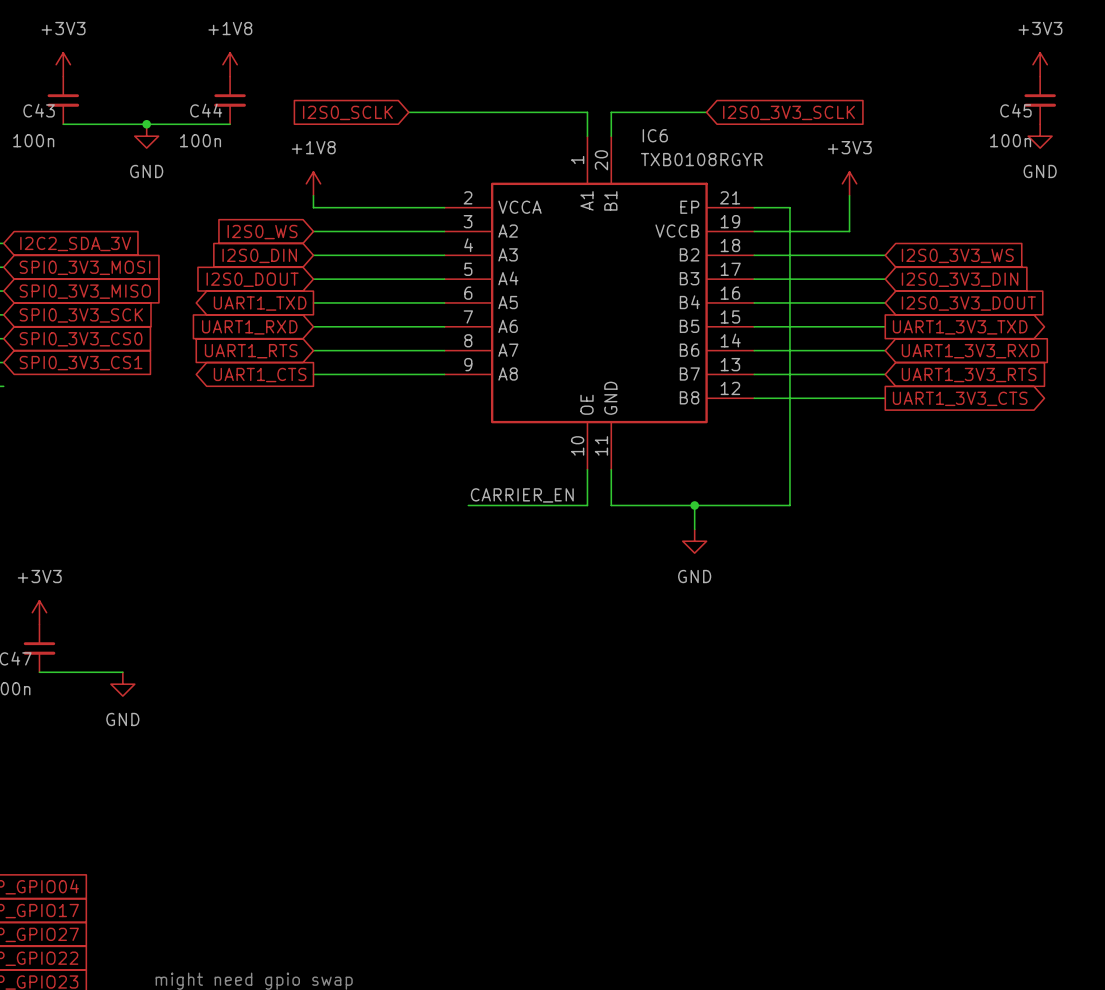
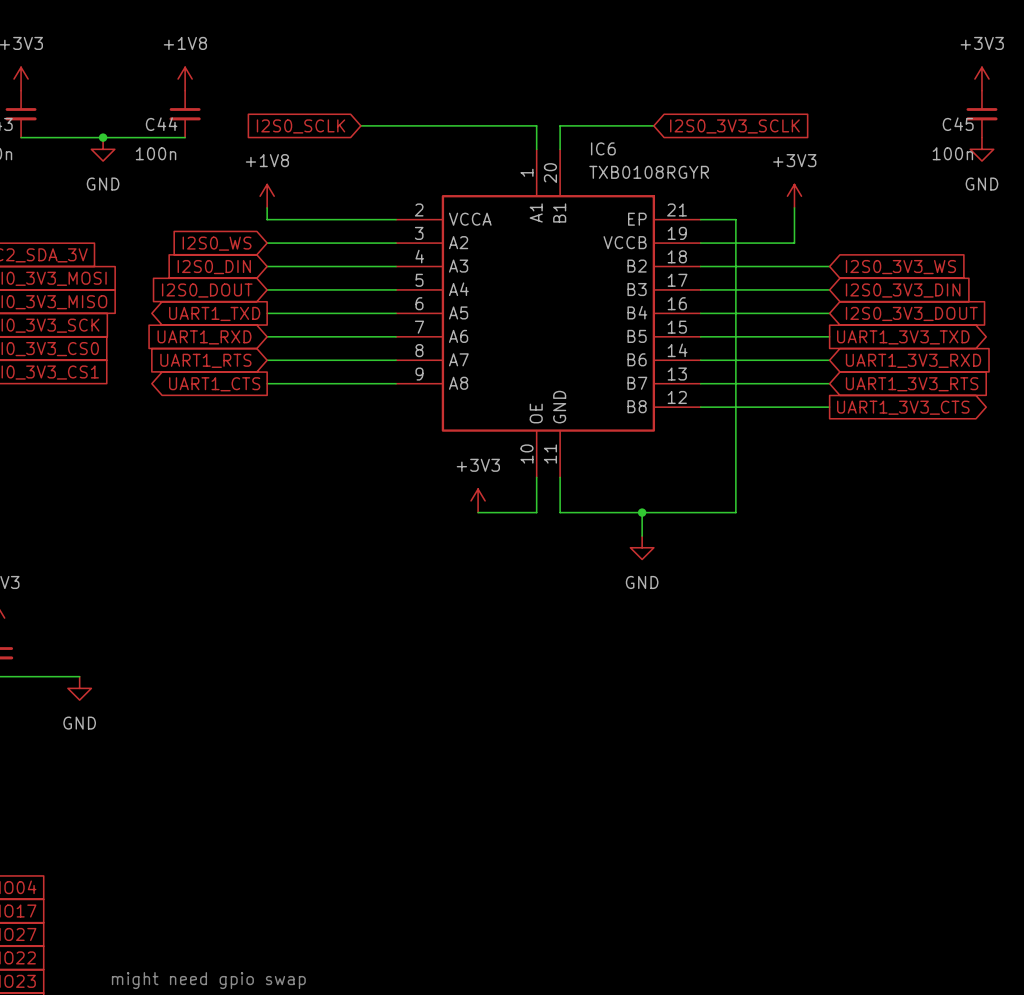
power symbol: none -> +3V3 (478, 500)
label: CARRIER_EN (522, 495) -> none
wire: (468, 505) (527, 505) -> none

